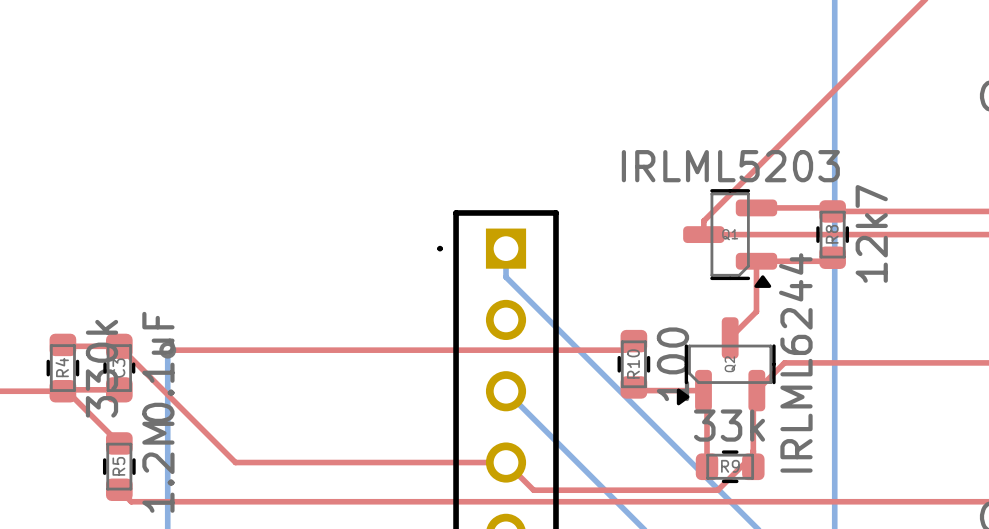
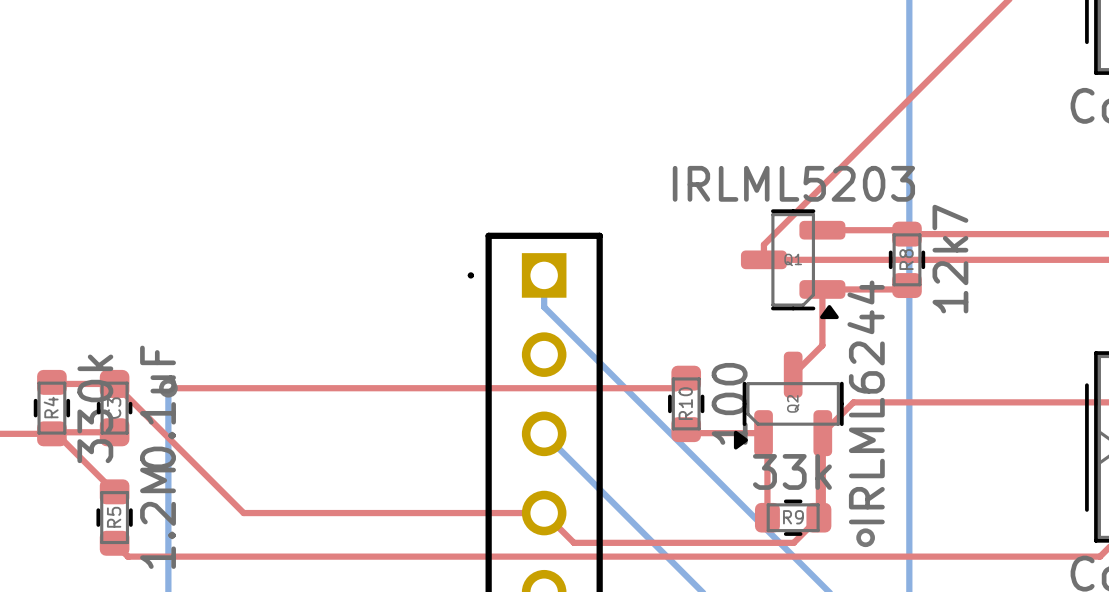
top track: (753, 454) (717, 490) (532, 489) -> (822, 433) (822, 513) (793, 542) (573, 542)
via: none -> (865, 537)

